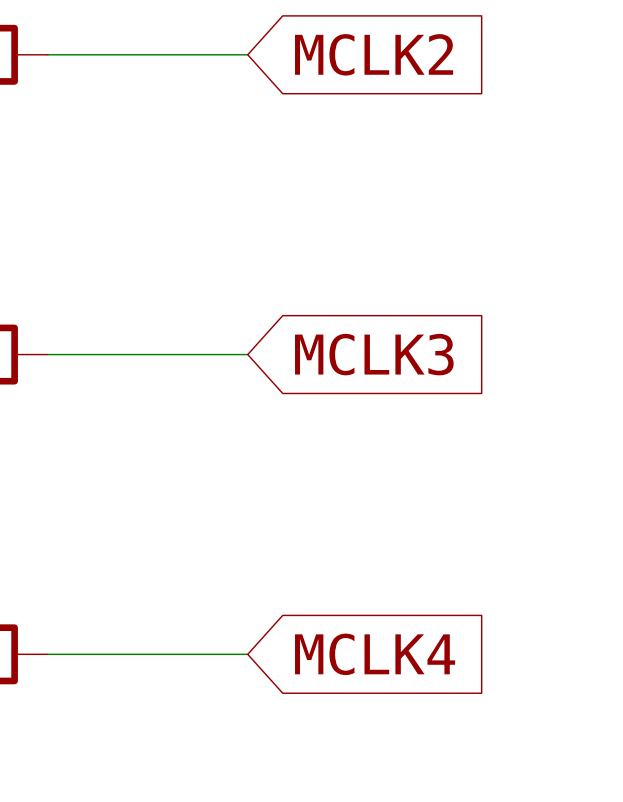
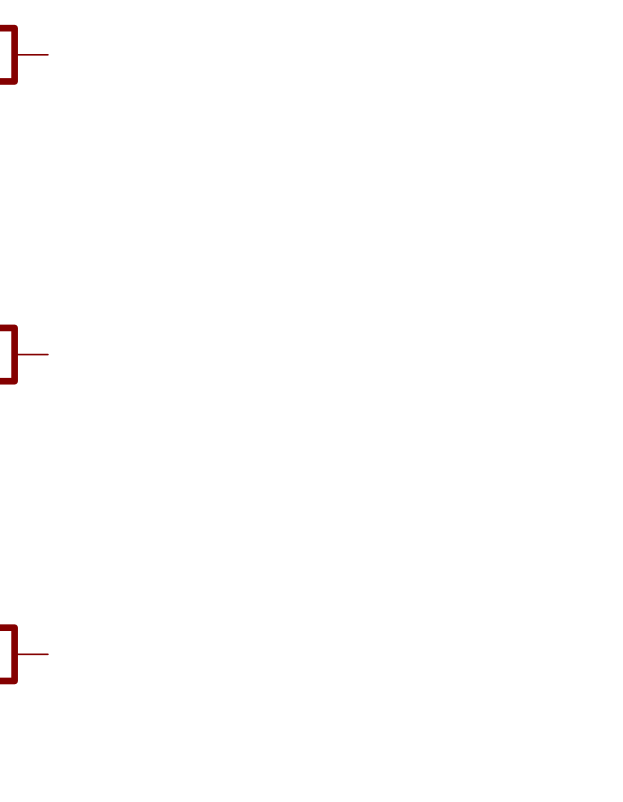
wire: (47, 54) (247, 54) -> none
global label: MCLK2 (374, 54) -> none
wire: (47, 354) (247, 354) -> none
global label: MCLK3 (374, 354) -> none
wire: (47, 654) (247, 654) -> none
global label: MCLK4 (375, 654) -> none

